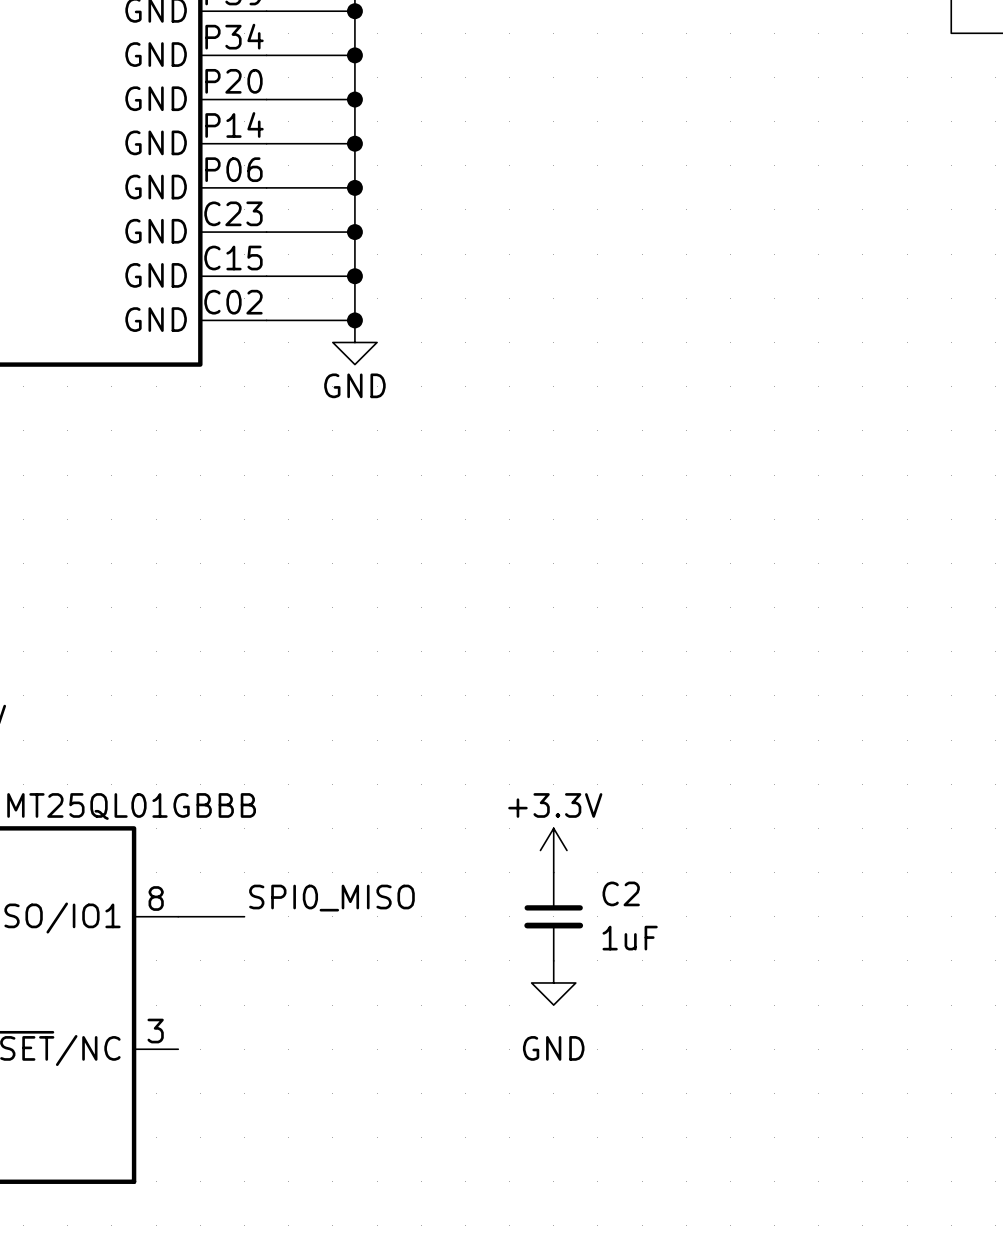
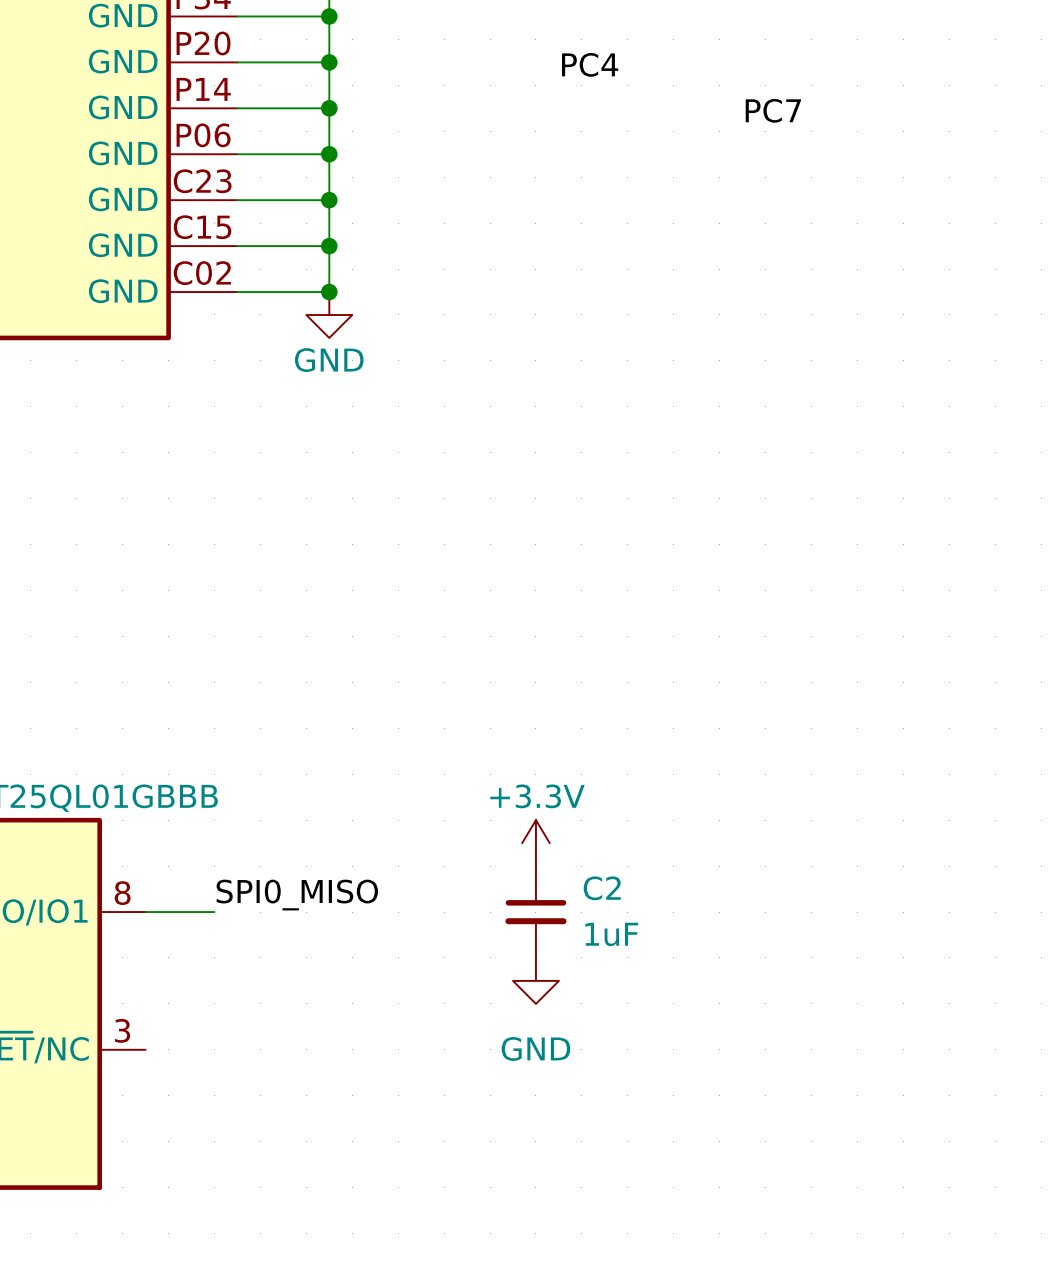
label: none -> PC4 (590, 64)
label: none -> PC7 (773, 110)

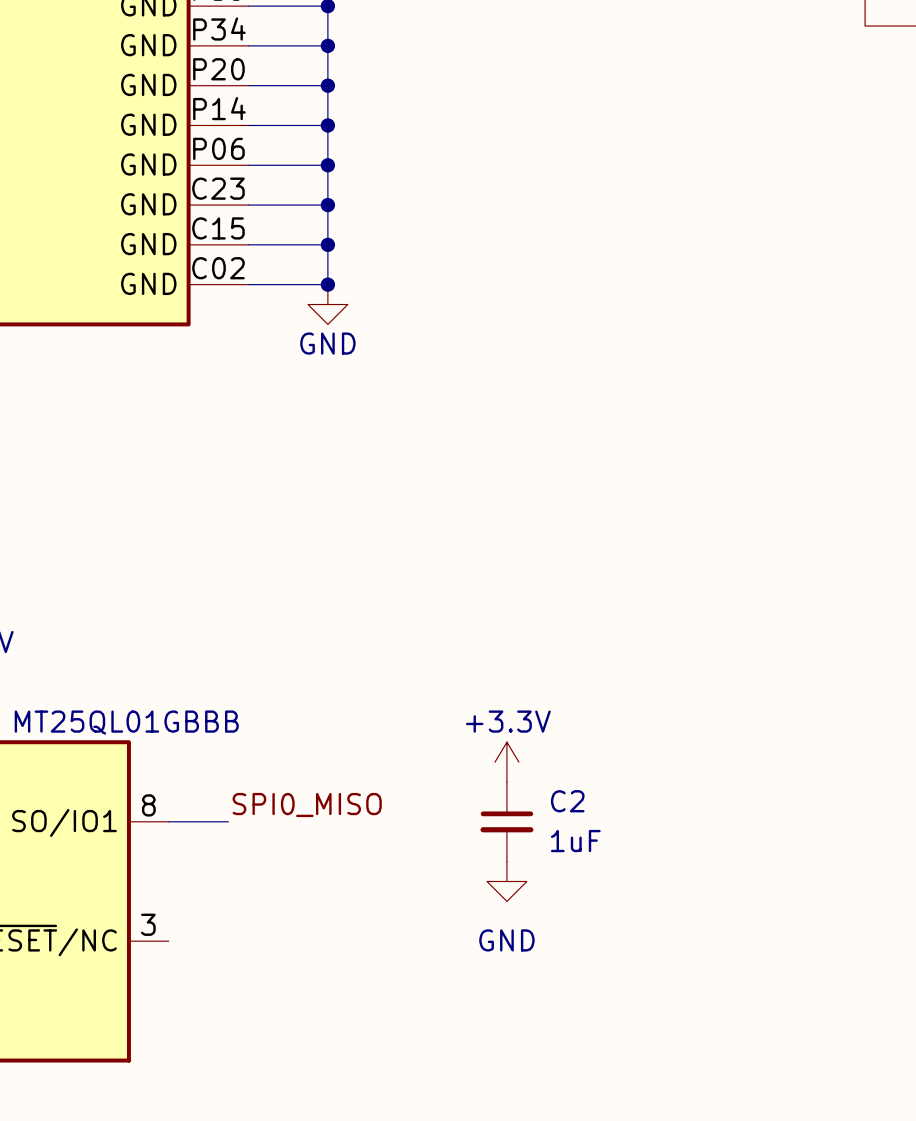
label: PC4 (590, 64) -> none
label: PC7 (773, 110) -> none

